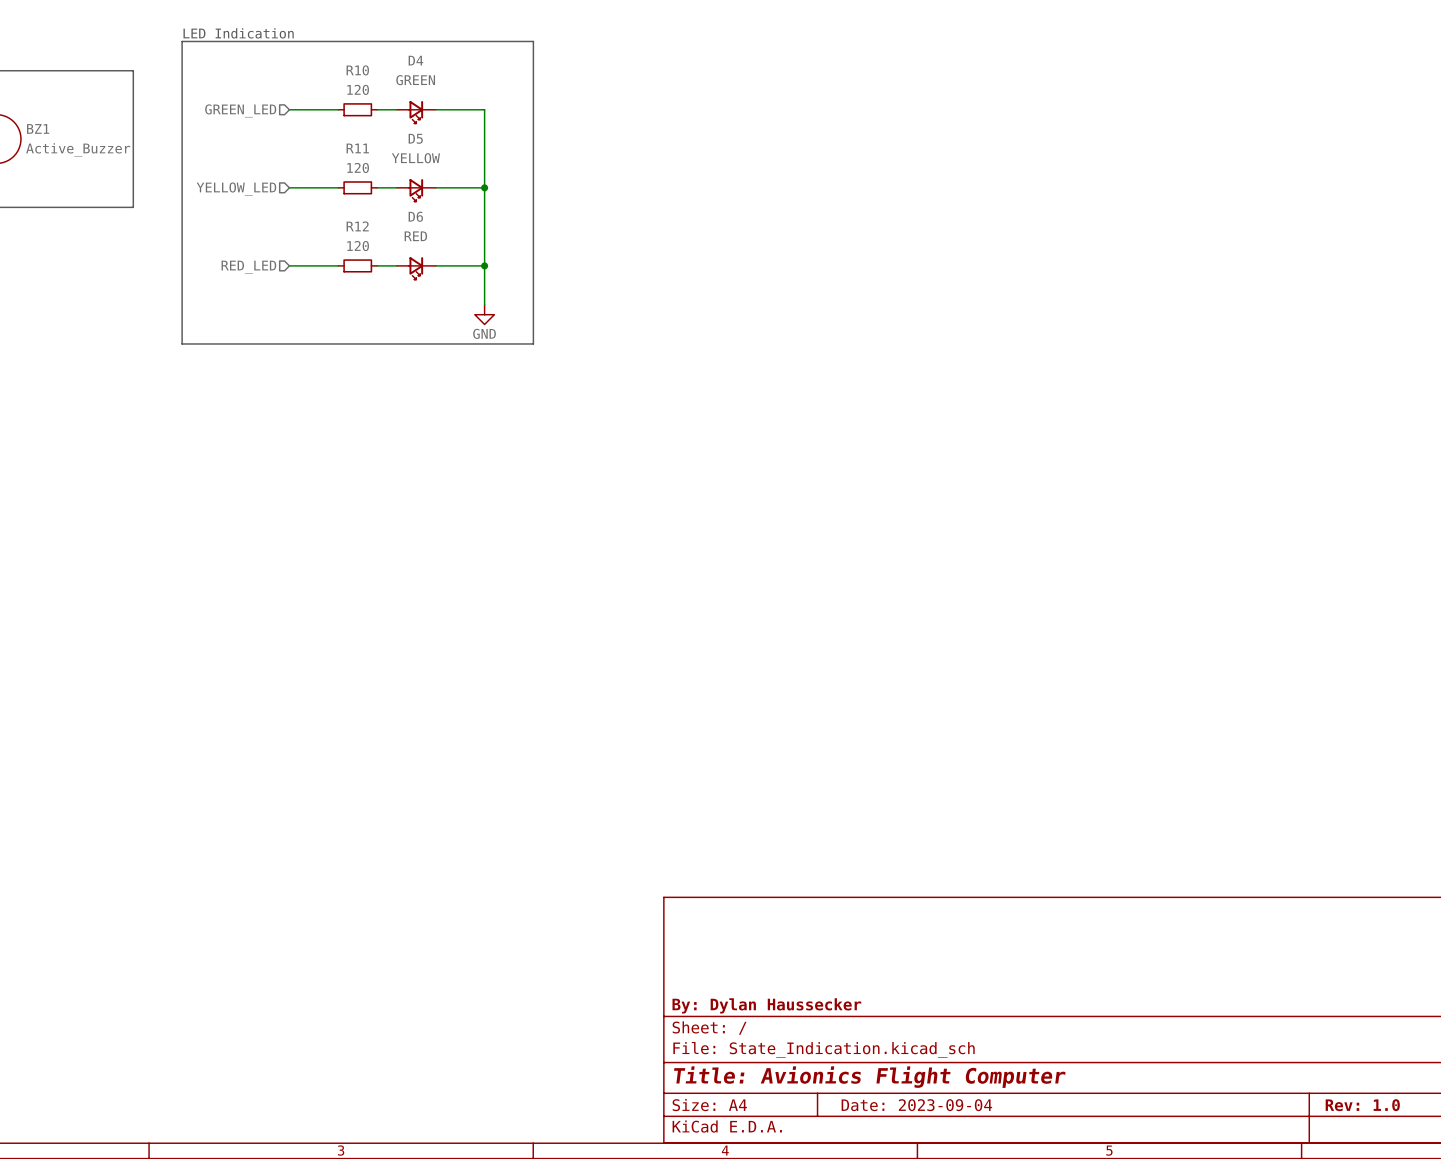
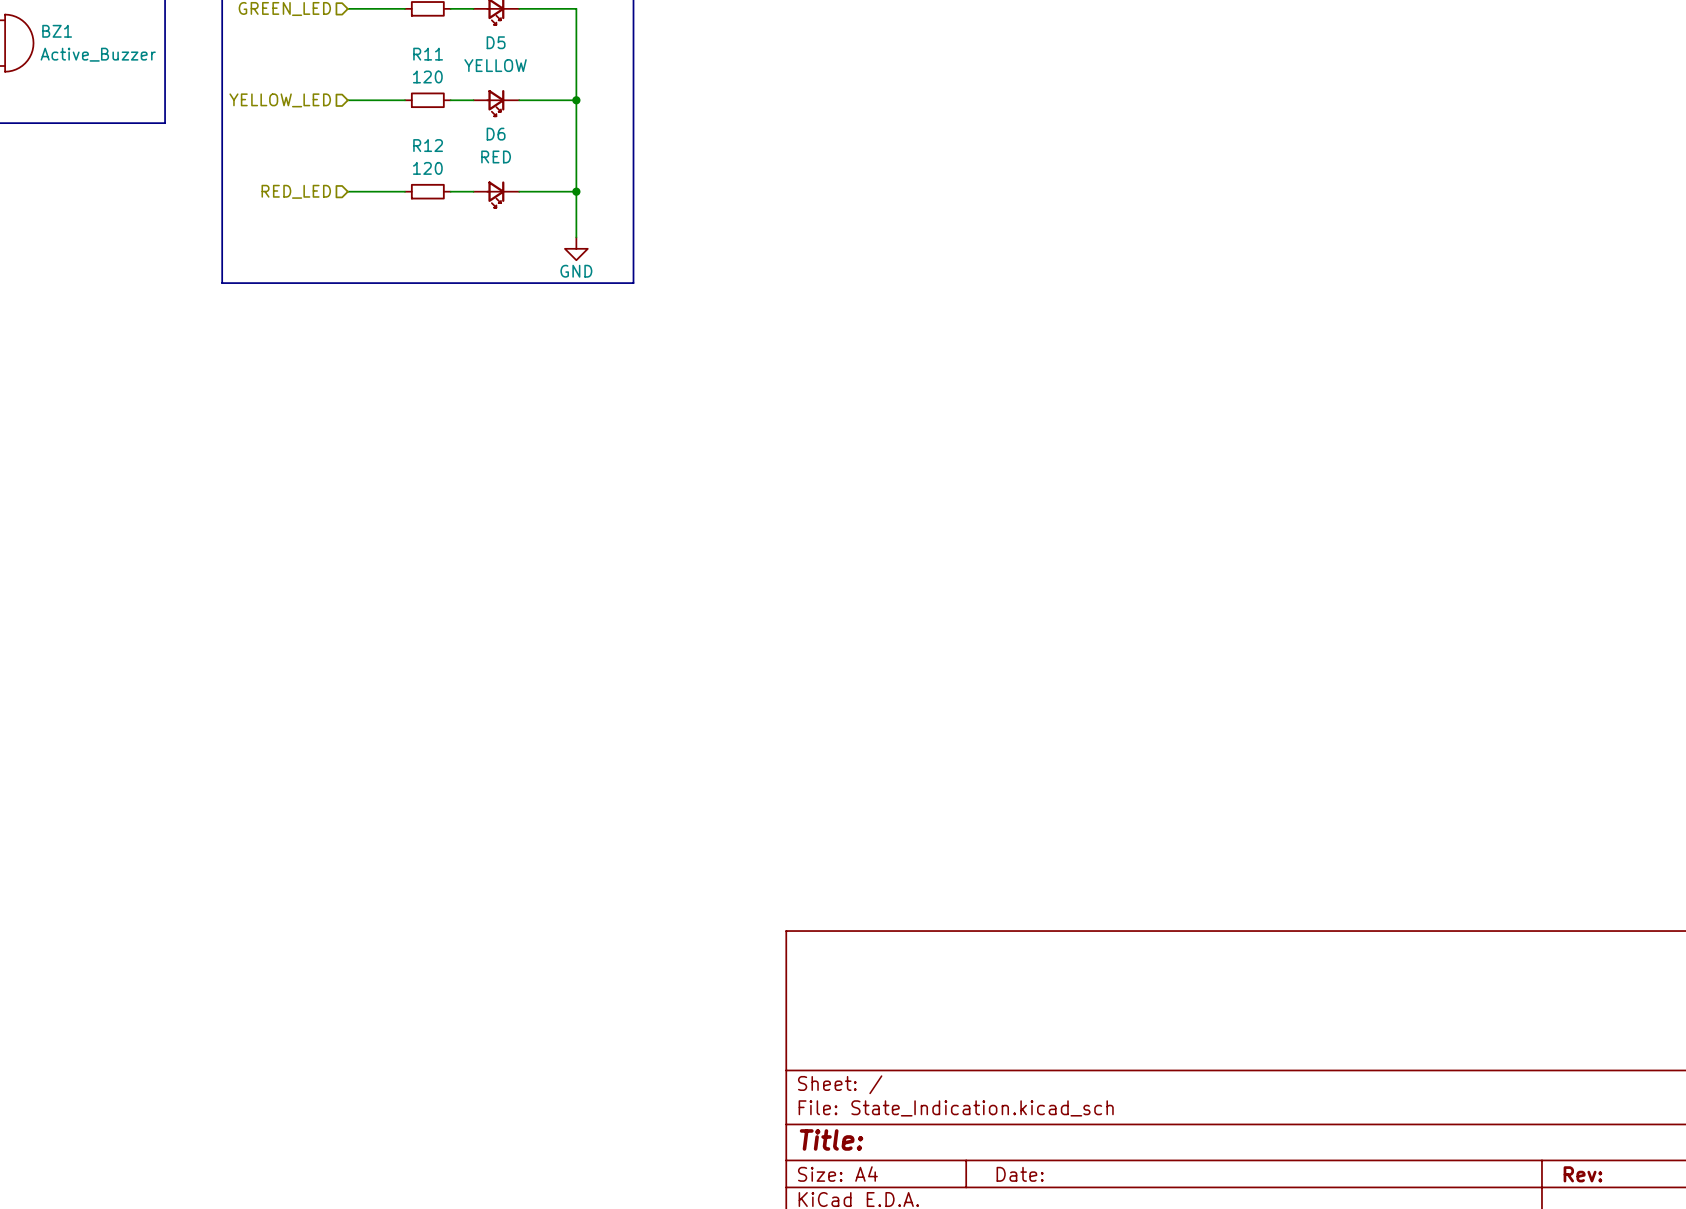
title block: By: Dylan Haussecker (766, 1005) -> none
title block: Title: Avionics Flight Computer (869, 1077) -> Title: (831, 1139)
title block: Date: 2023-09-04 (916, 1105) -> Date: (1020, 1174)
title block: Rev: 1.0 (1362, 1105) -> Rev: (1582, 1174)

